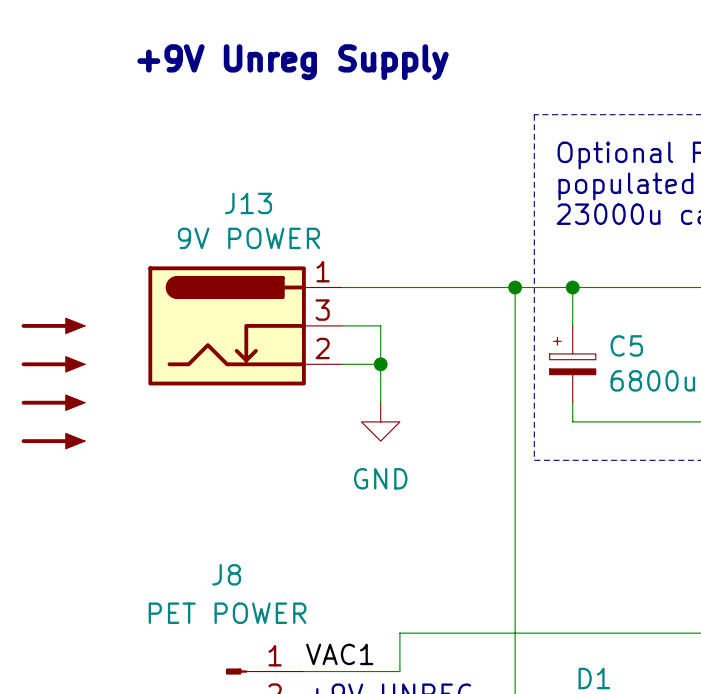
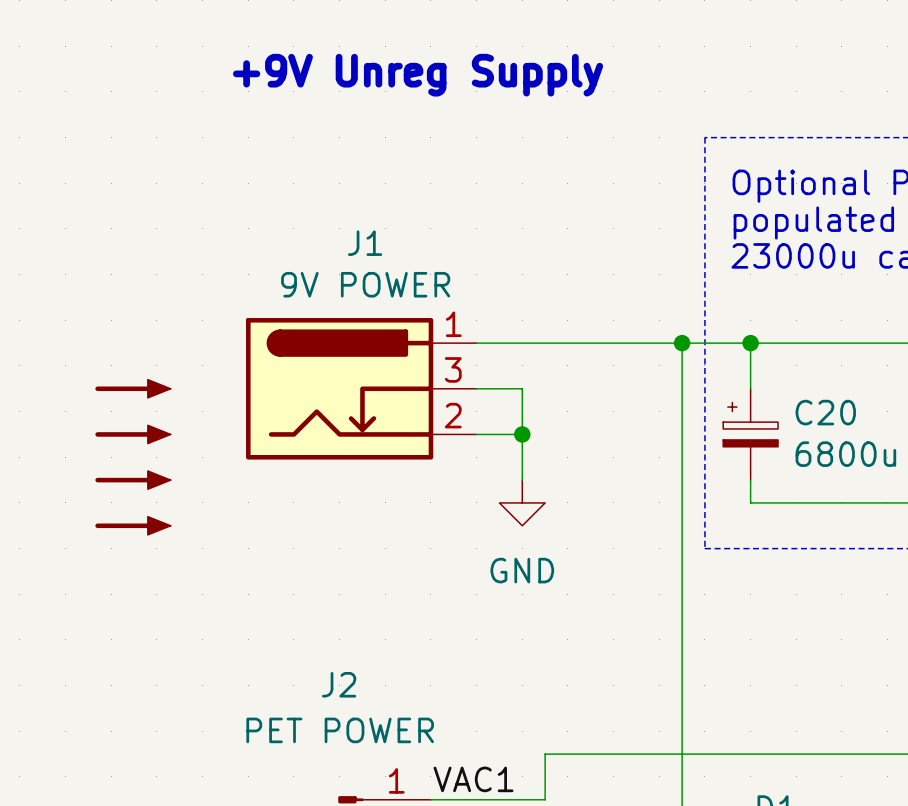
J13 name: J13 (248, 203) -> J1 (365, 243)
C5 name: C5 (626, 345) -> C20 (825, 412)
J8 name: J8 (226, 574) -> J2 (339, 684)

